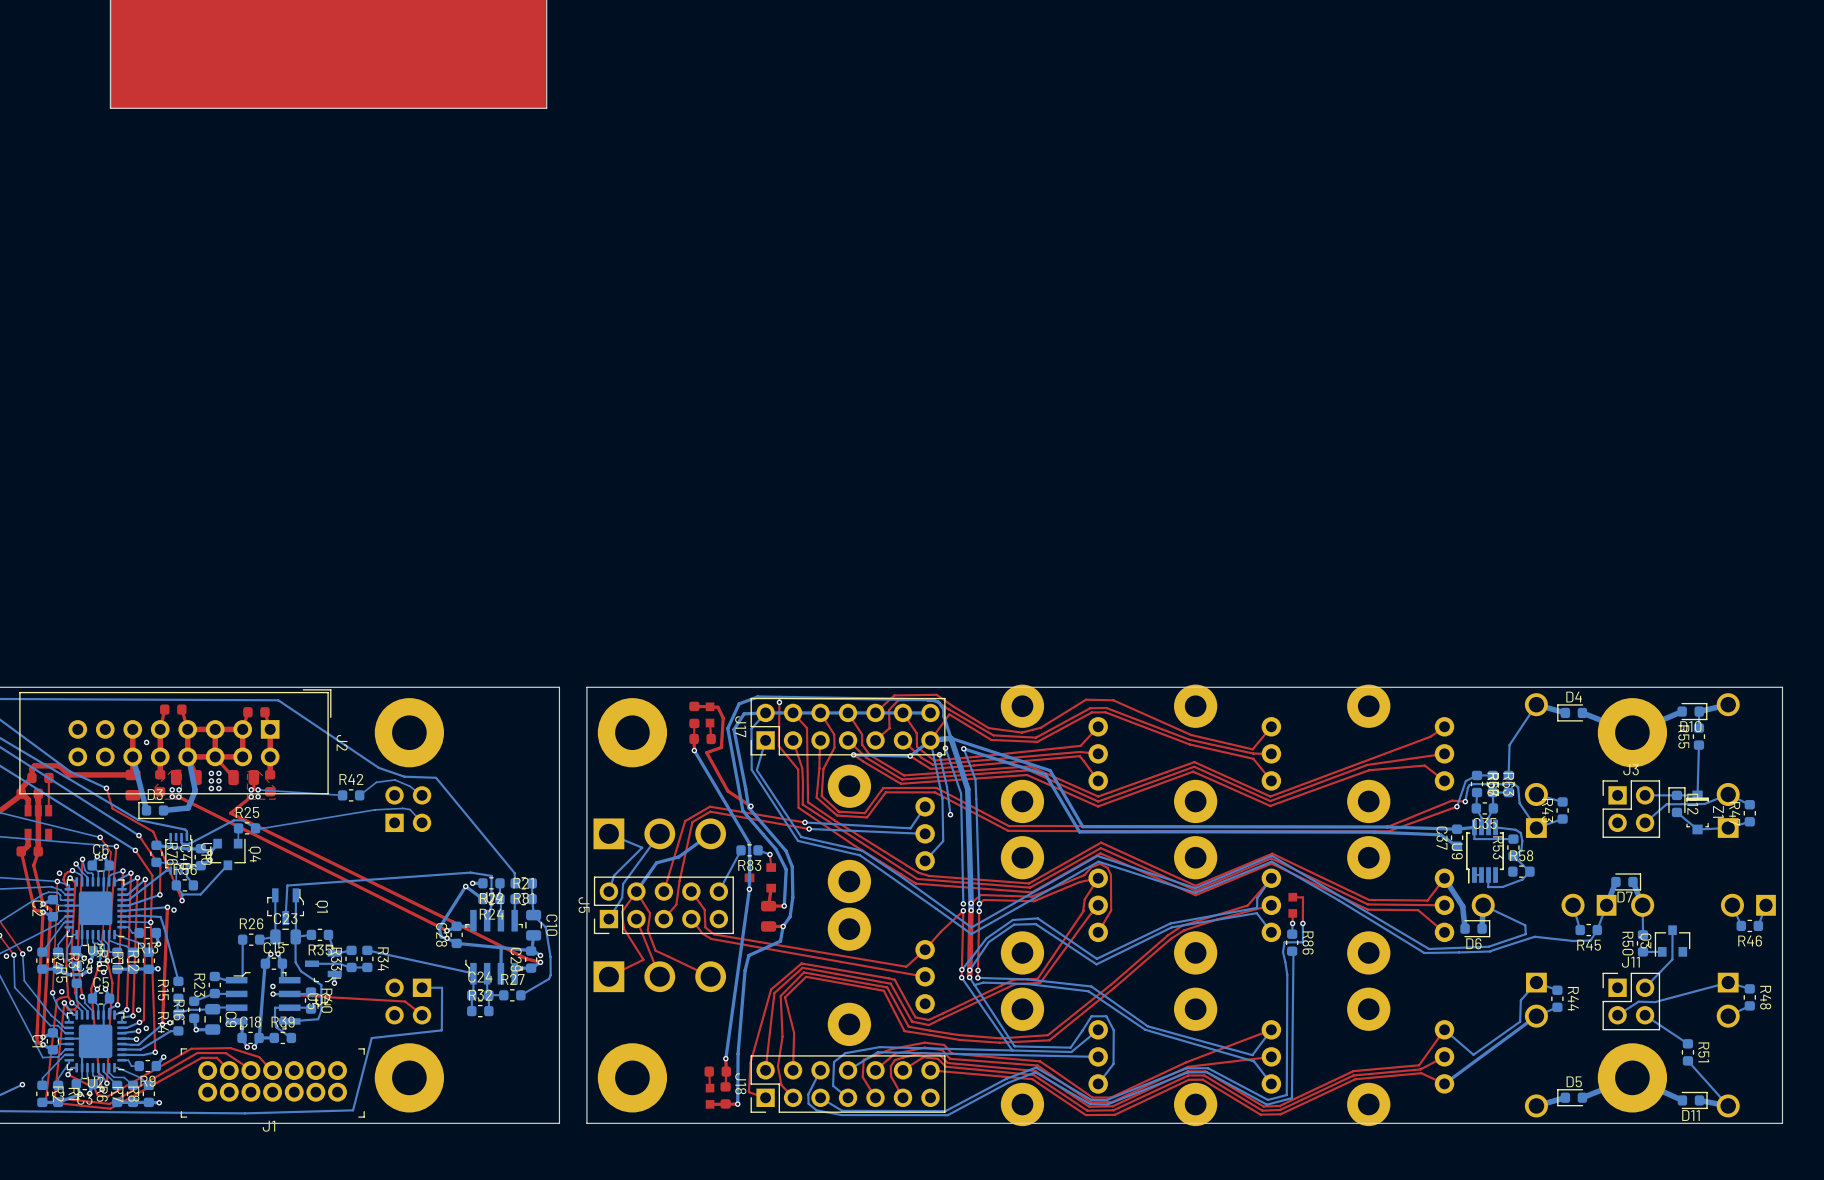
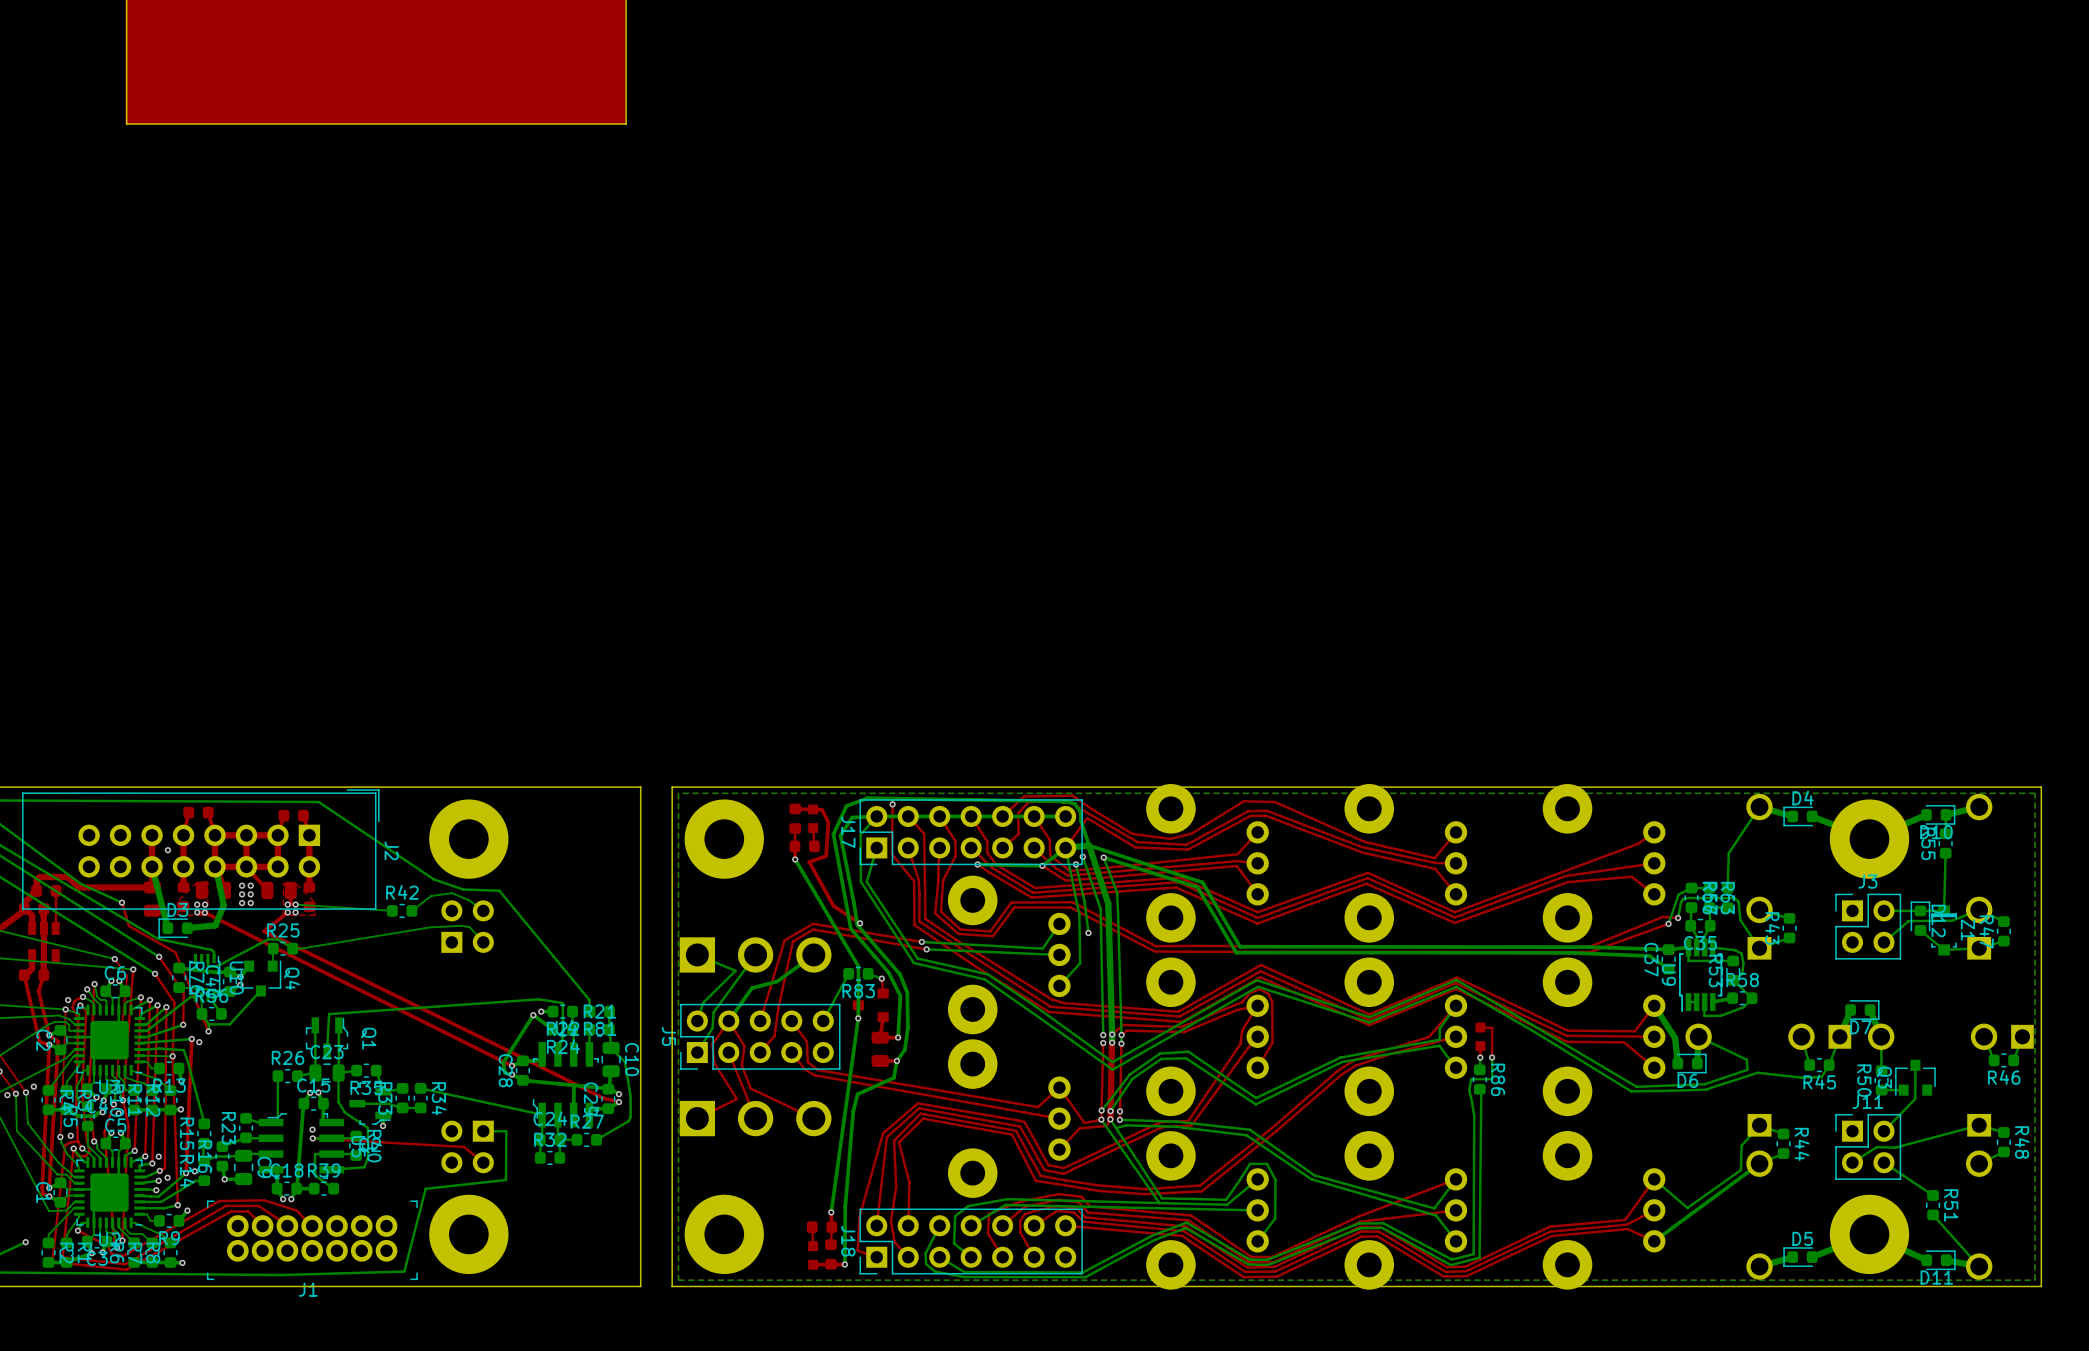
bottom zone outline: none -> (2035, 793) (678, 793) (678, 1280) (2035, 1280) (2035, 793)
bottom track: none -> (1732, 998) (1712, 1002)
top track: (963, 910) (925, 949) -> (1101, 1119) (1084, 1122) (1059, 1087)
top track: none -> (1110, 1119) (1106, 1125) (1079, 1128) (1059, 1149)

